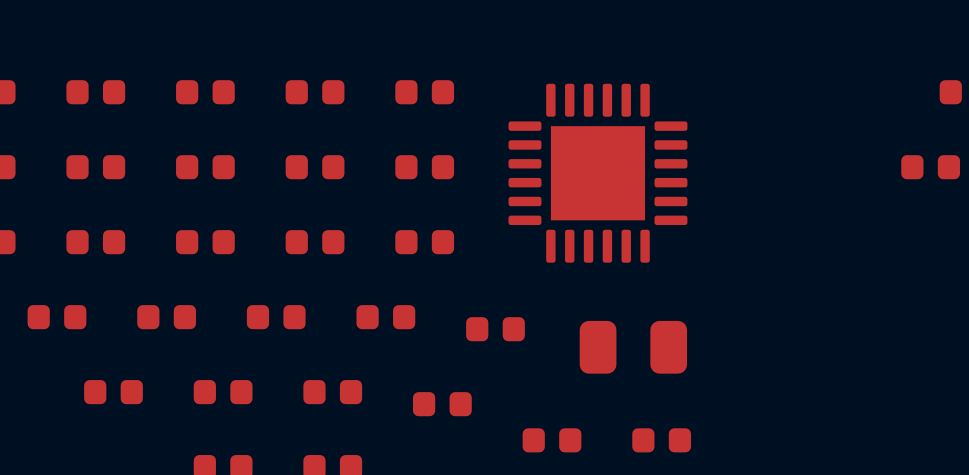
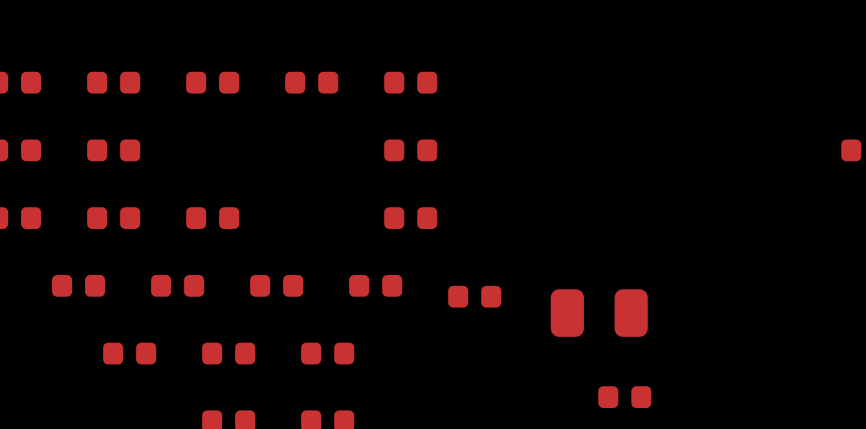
part: (205, 167) -> none
part: (315, 167) -> none
part: (597, 173) -> none
part: (315, 242) -> none
part: (442, 404) -> none
part: (552, 440) -> none

